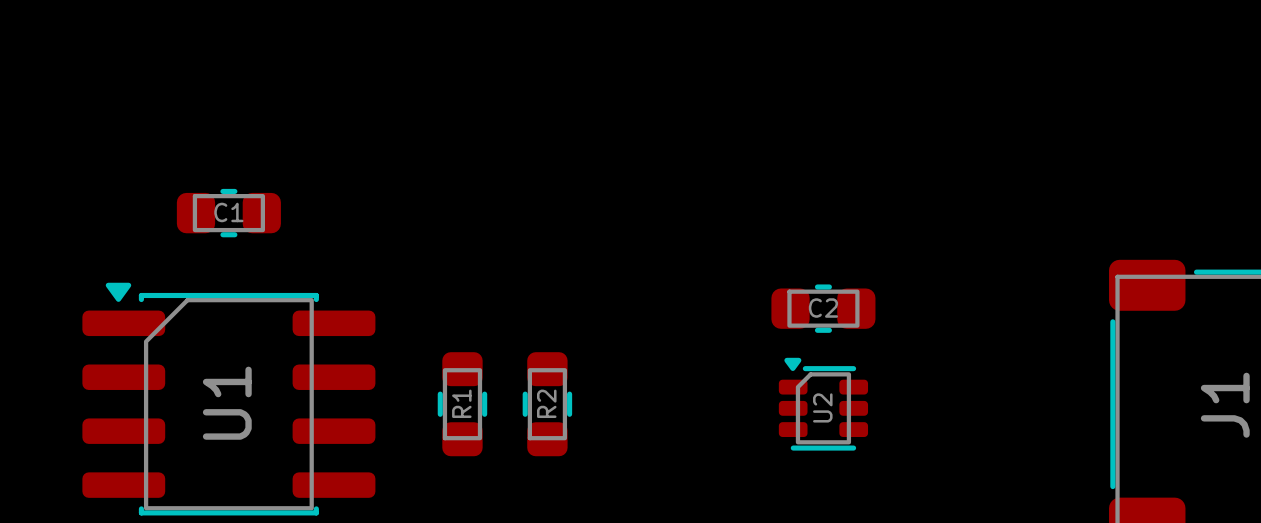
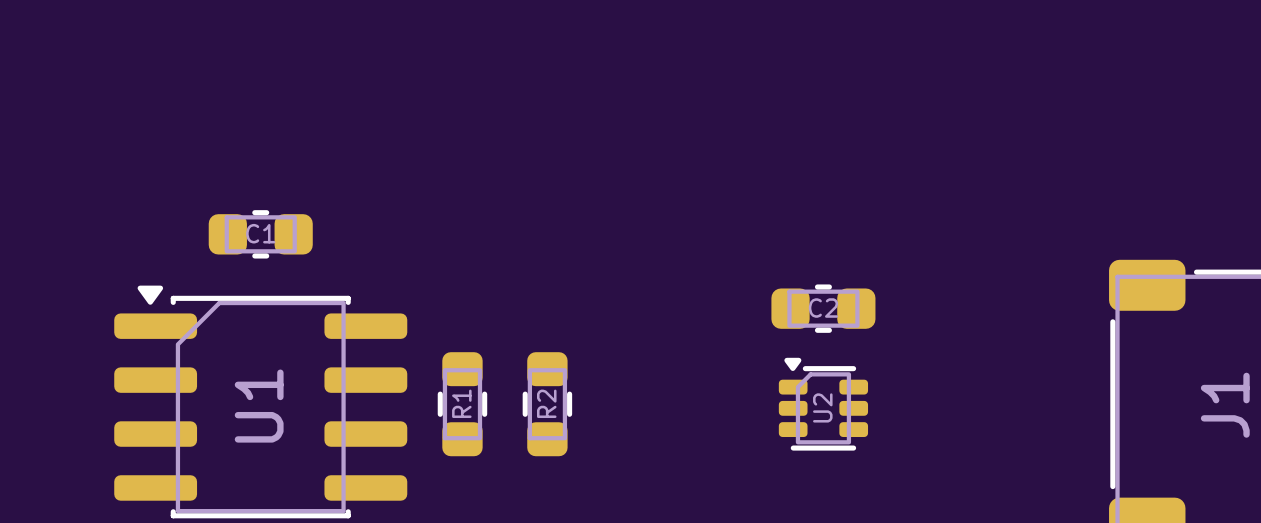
C1 position: (228, 213) -> (260, 234)
U1 position: (228, 399) -> (260, 401)

